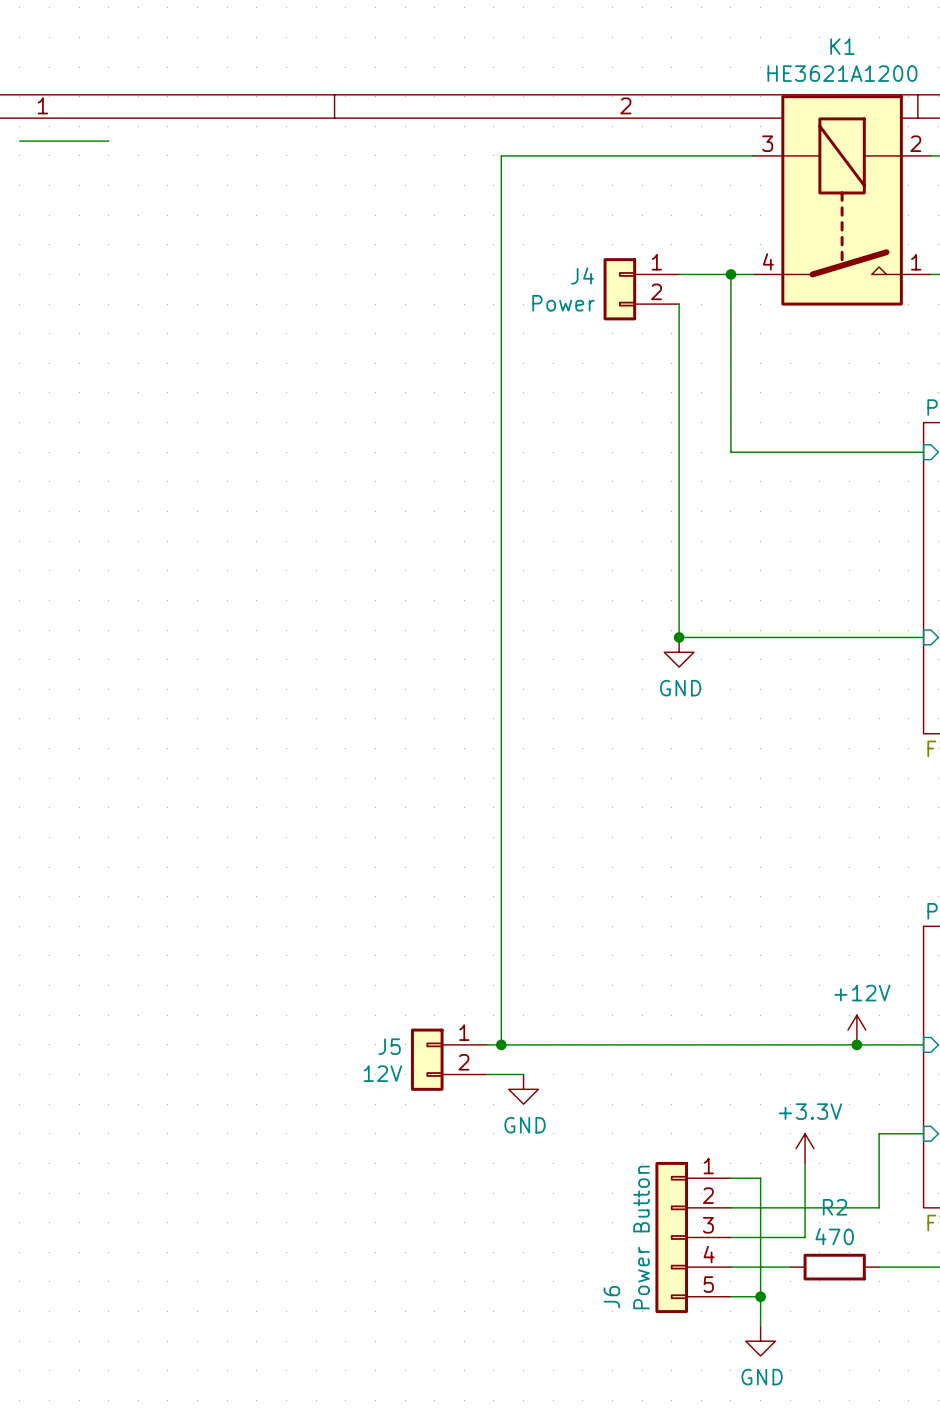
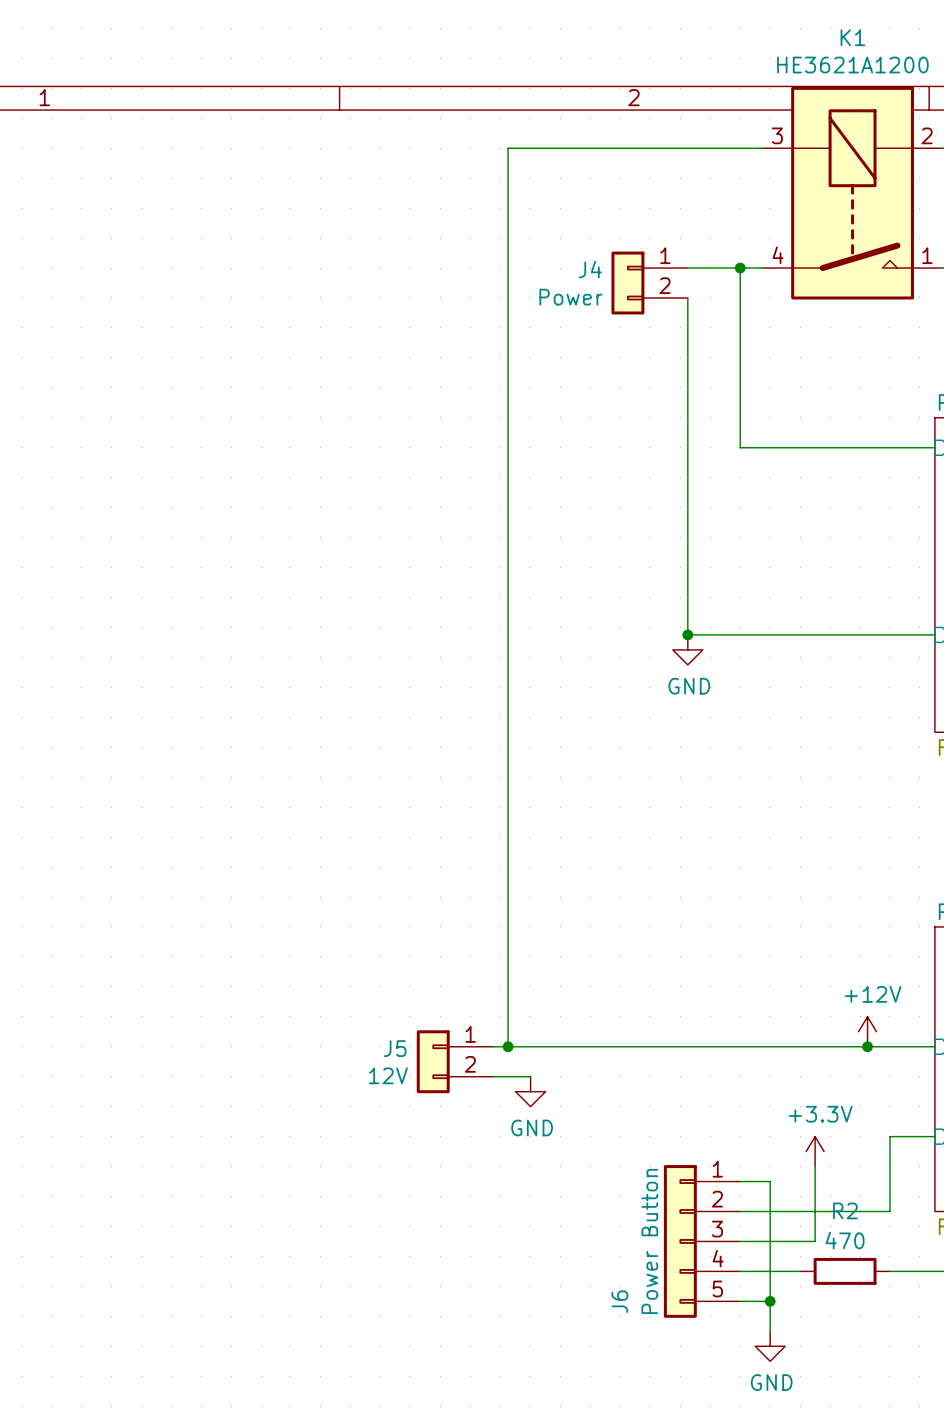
wire: (19, 141) (108, 141) -> none

